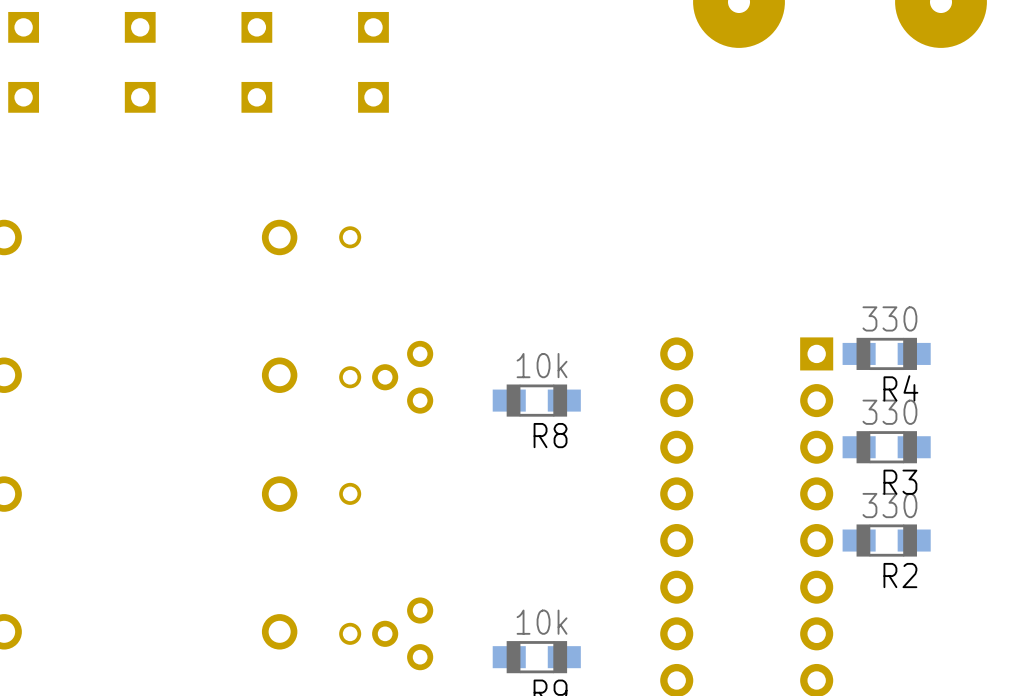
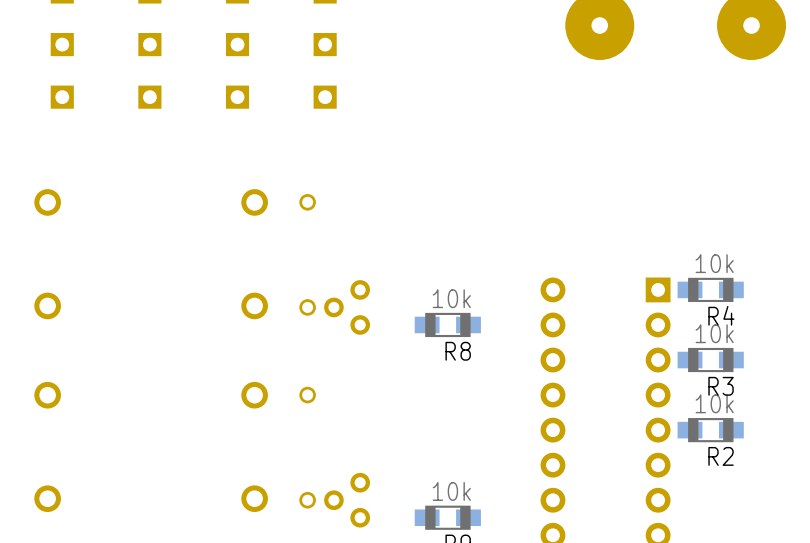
R4 value: 330 (889, 318) -> 10k (714, 263)
R3 value: 330 (889, 412) -> 10k (714, 333)
R2 value: 330 (889, 505) -> 10k (714, 403)

